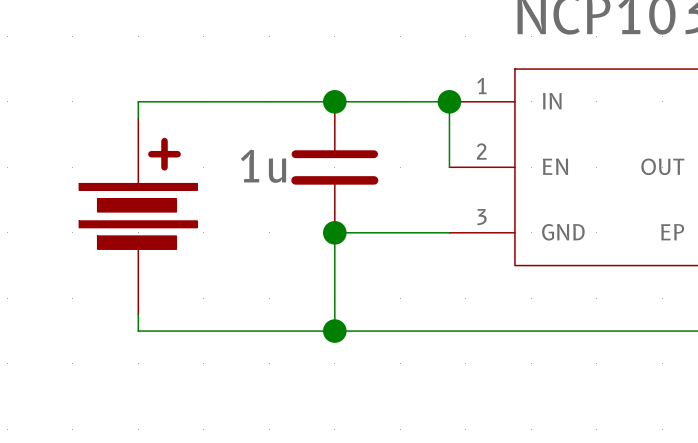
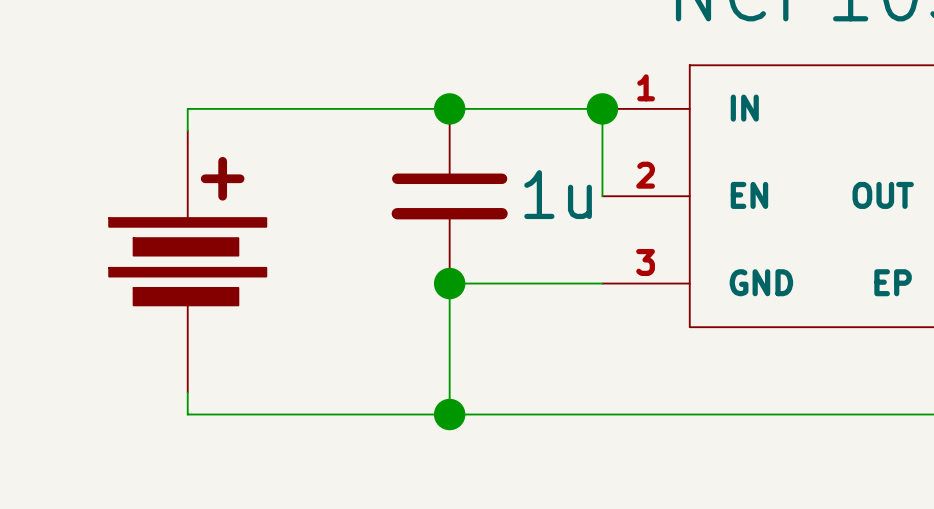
part value position: 1u (263, 166) -> 1u (558, 194)

